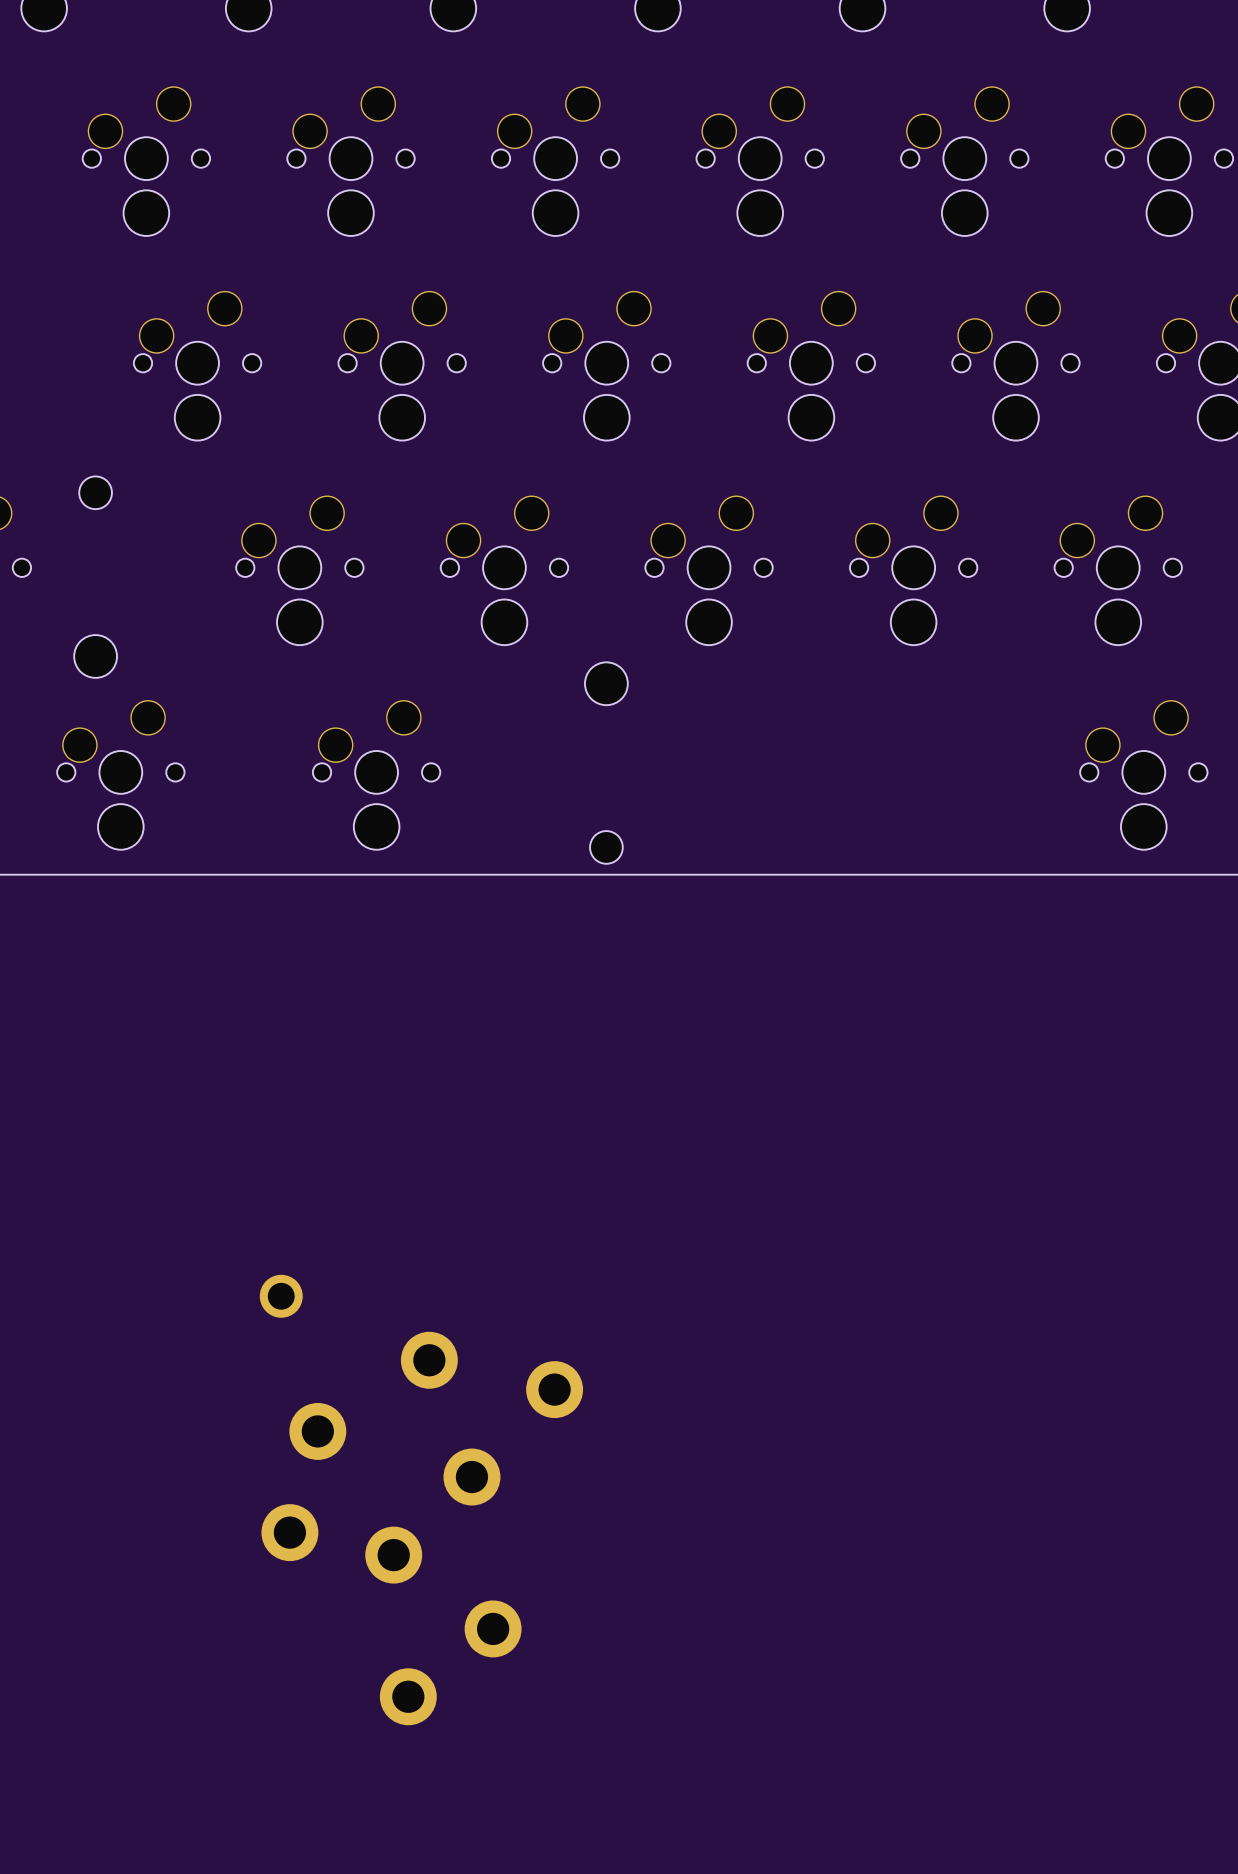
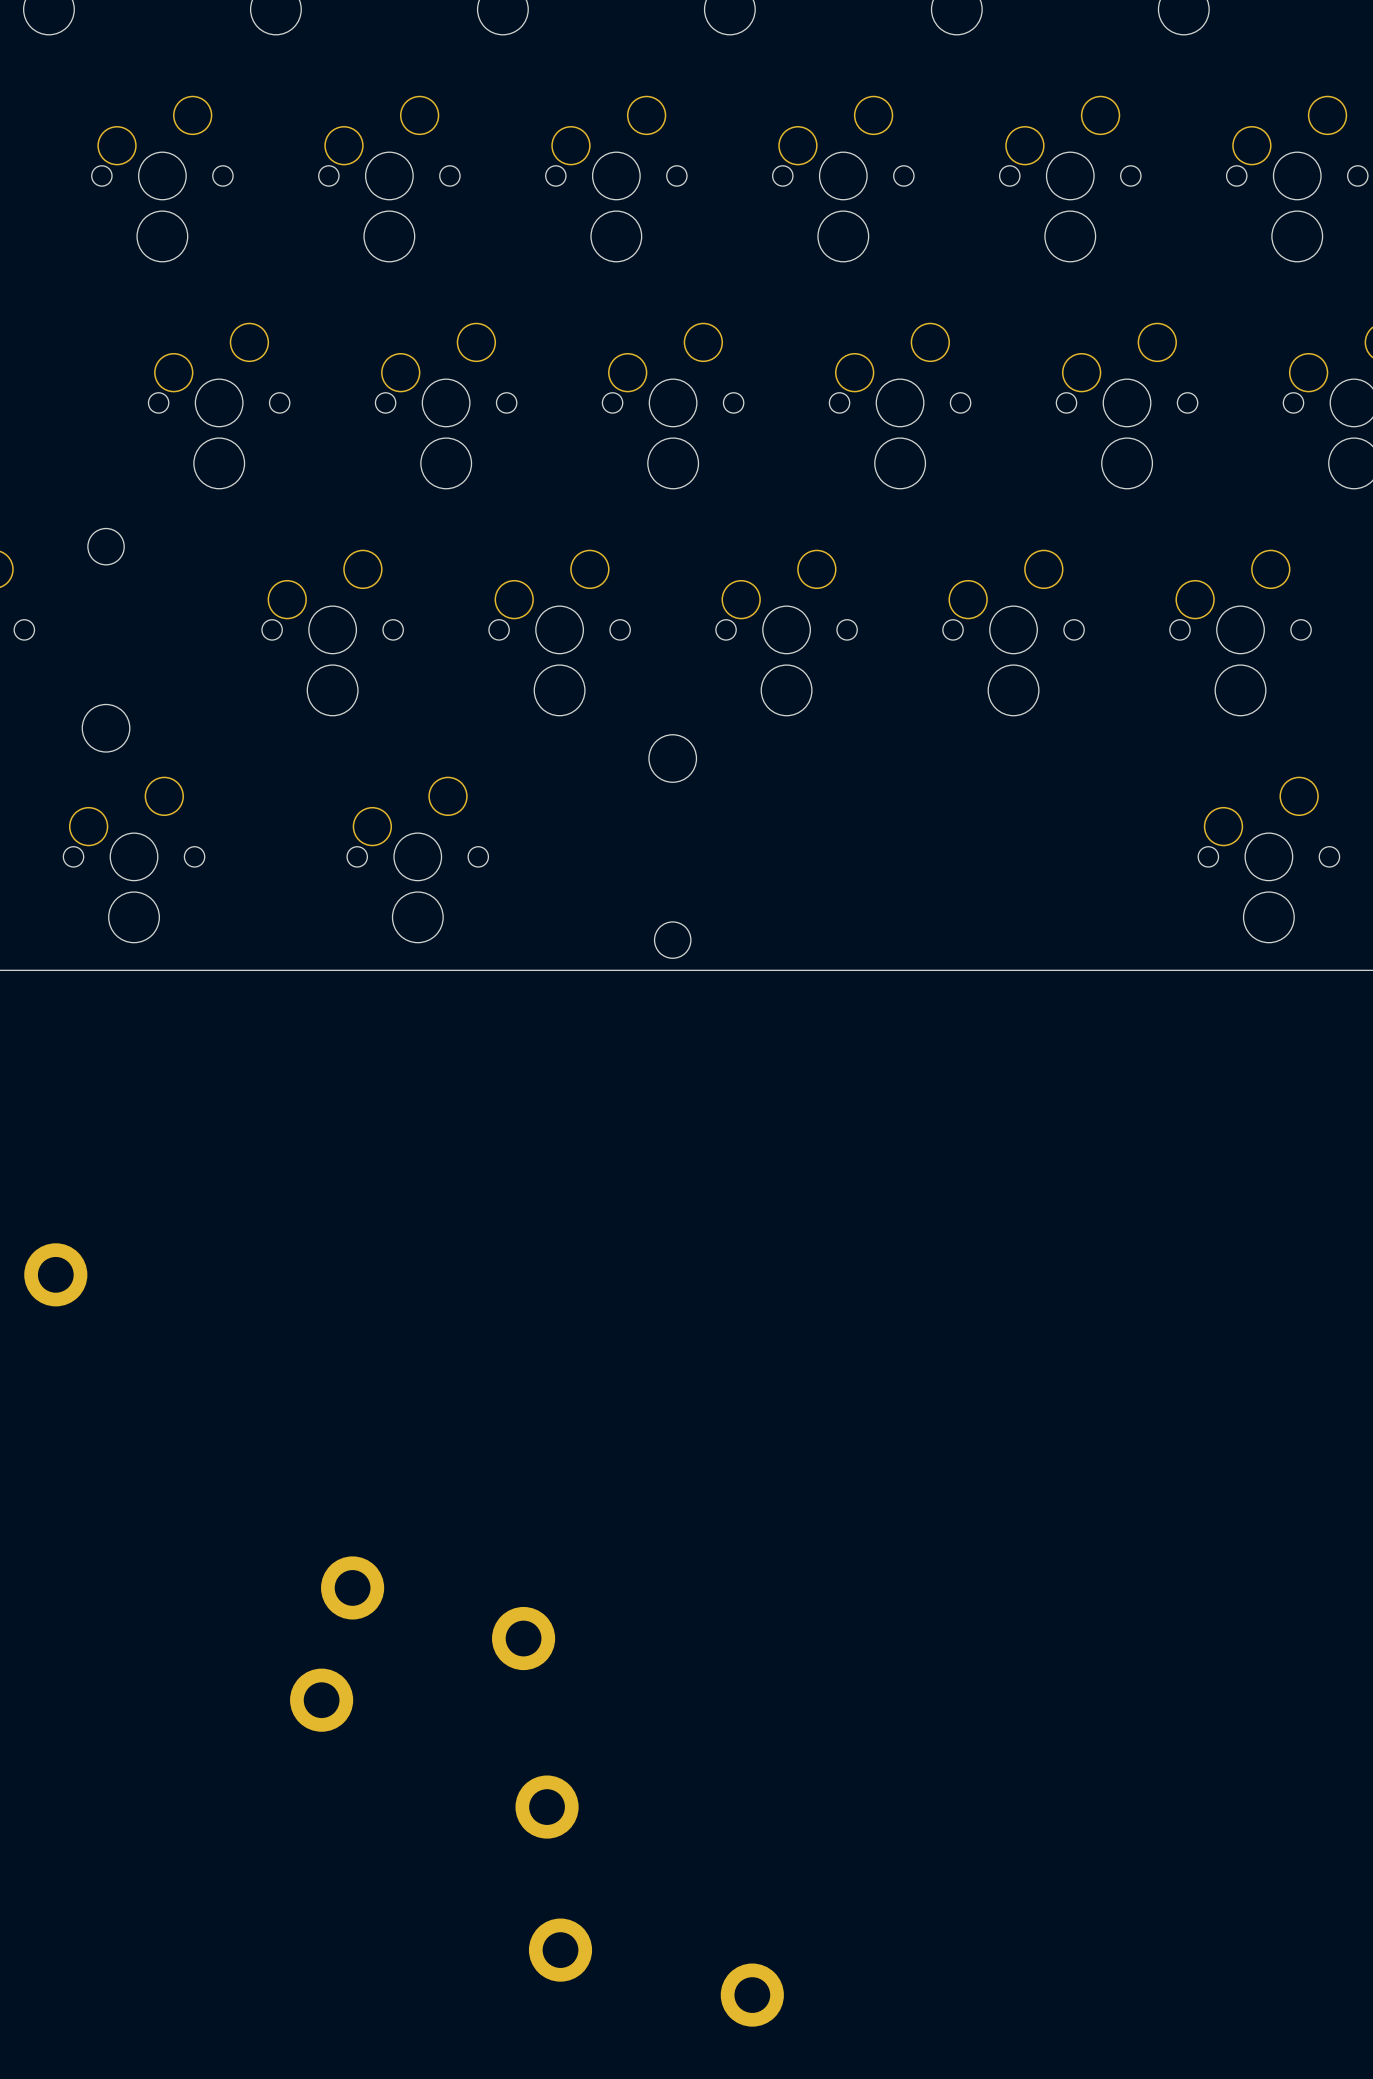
part: none -> (55, 1274)
part: (281, 1296) -> none
part: (429, 1360) -> none
part: (554, 1389) -> none
part: (393, 1555) -> none
part position: (408, 1696) -> (560, 1950)
part: none -> (752, 1995)

